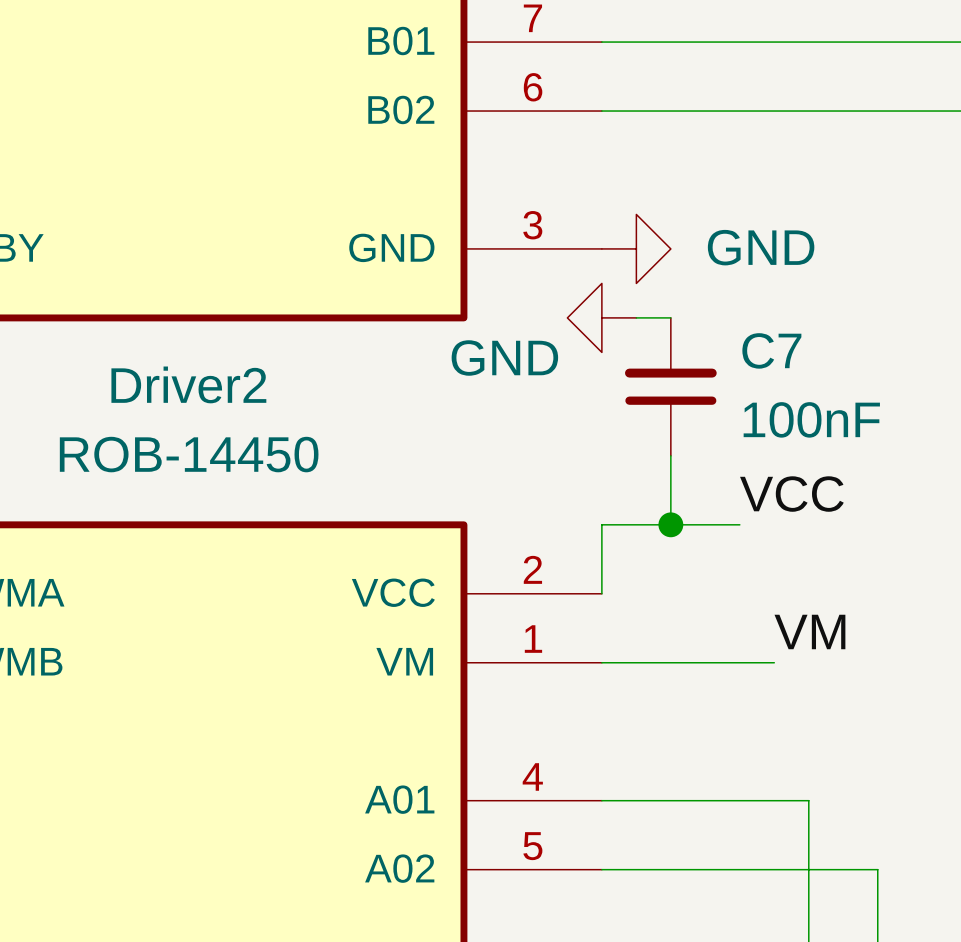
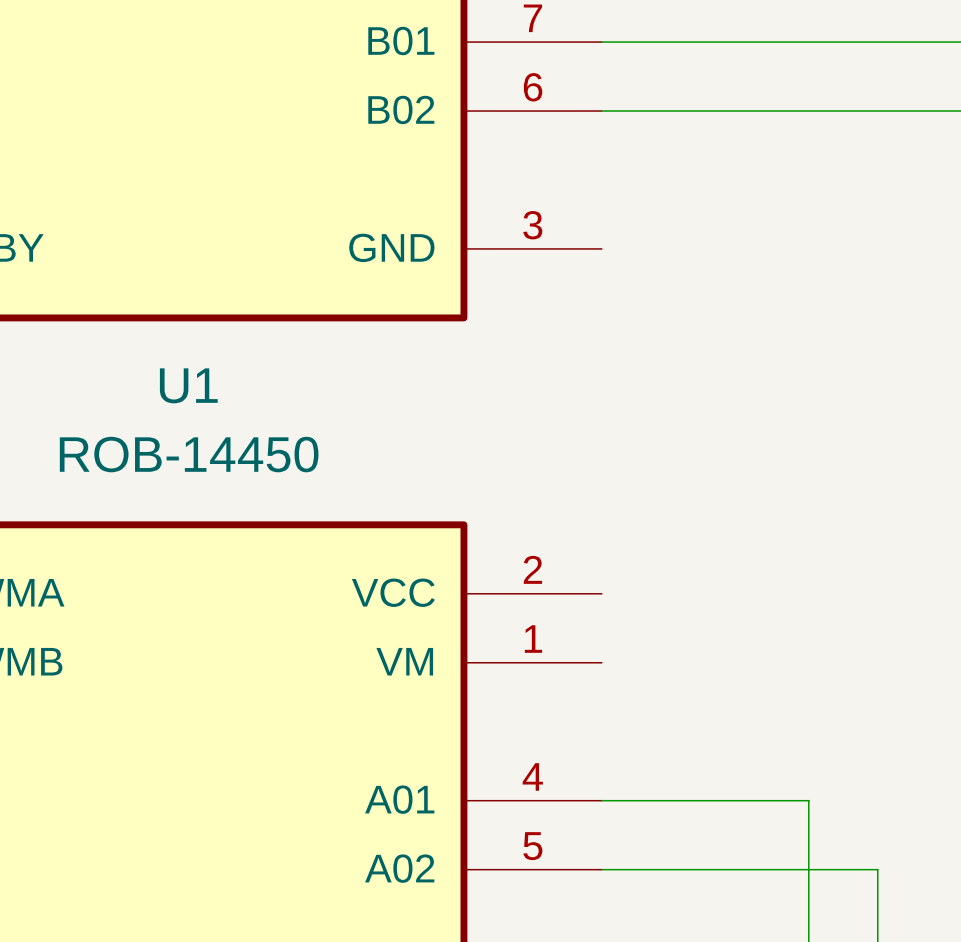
power symbol: GND (636, 248) -> none
power symbol: GND (601, 317) -> none
wire: (636, 317) (670, 317) -> none
Driver2 name: Driver2 (188, 384) -> U1 (188, 385)
C7: 100nF (670, 386) -> none
wire: (670, 455) (670, 524) -> none
label: VCC (791, 494) -> none
junction: (670, 524) -> none
wire: (739, 524) (601, 524) (601, 593) -> none
label: VM (809, 631) -> none
wire: (601, 662) (774, 662) -> none

